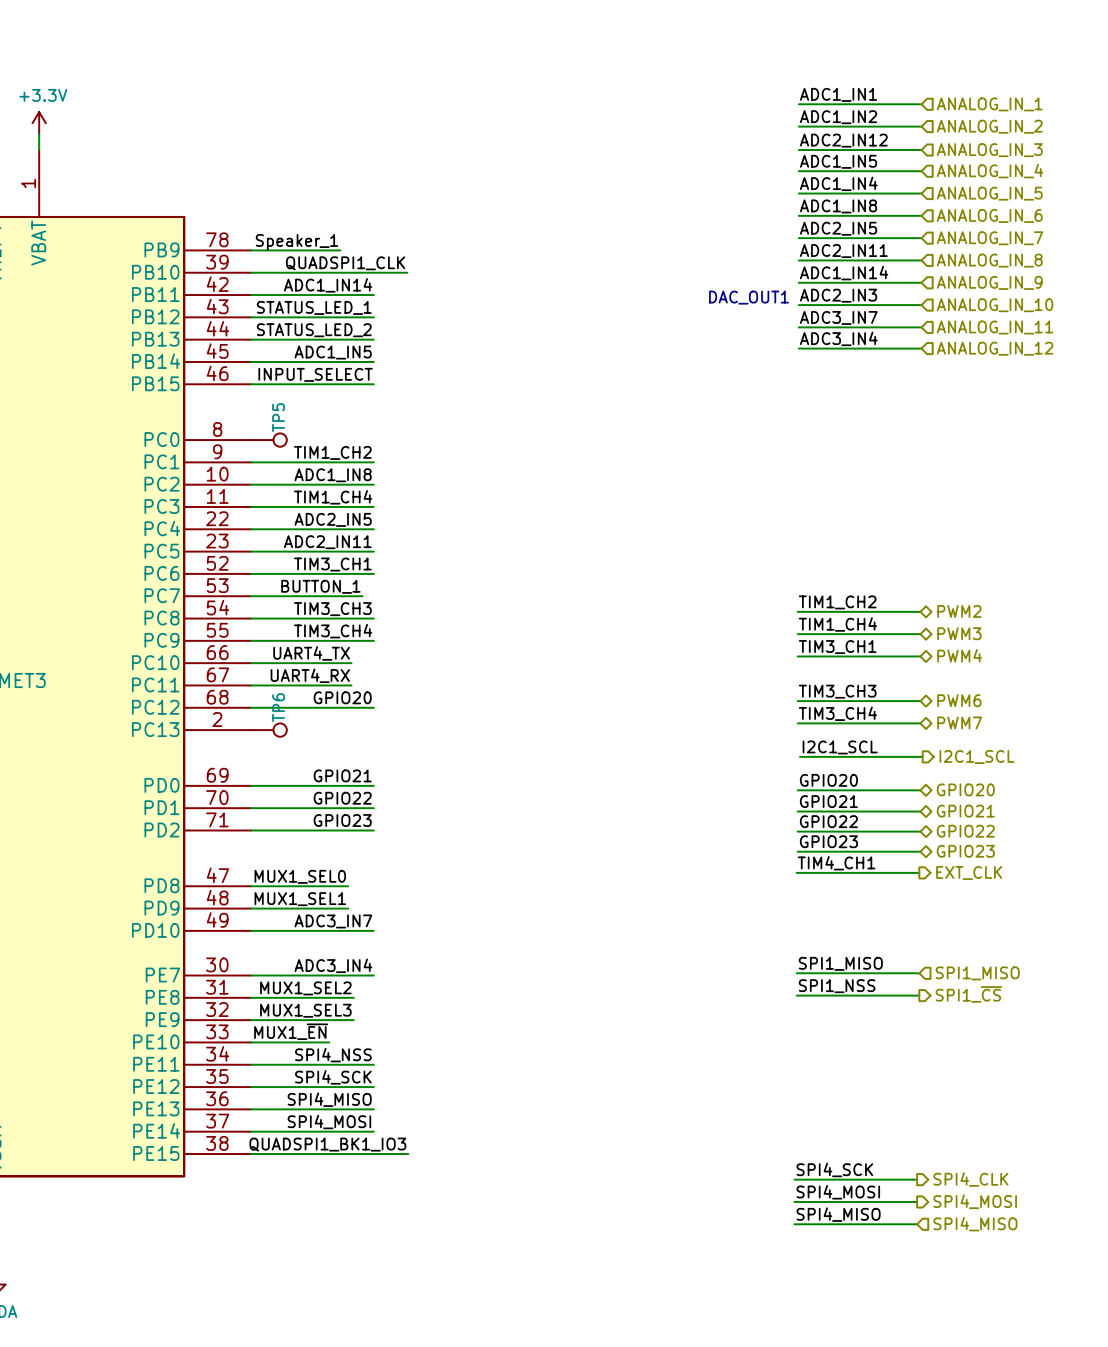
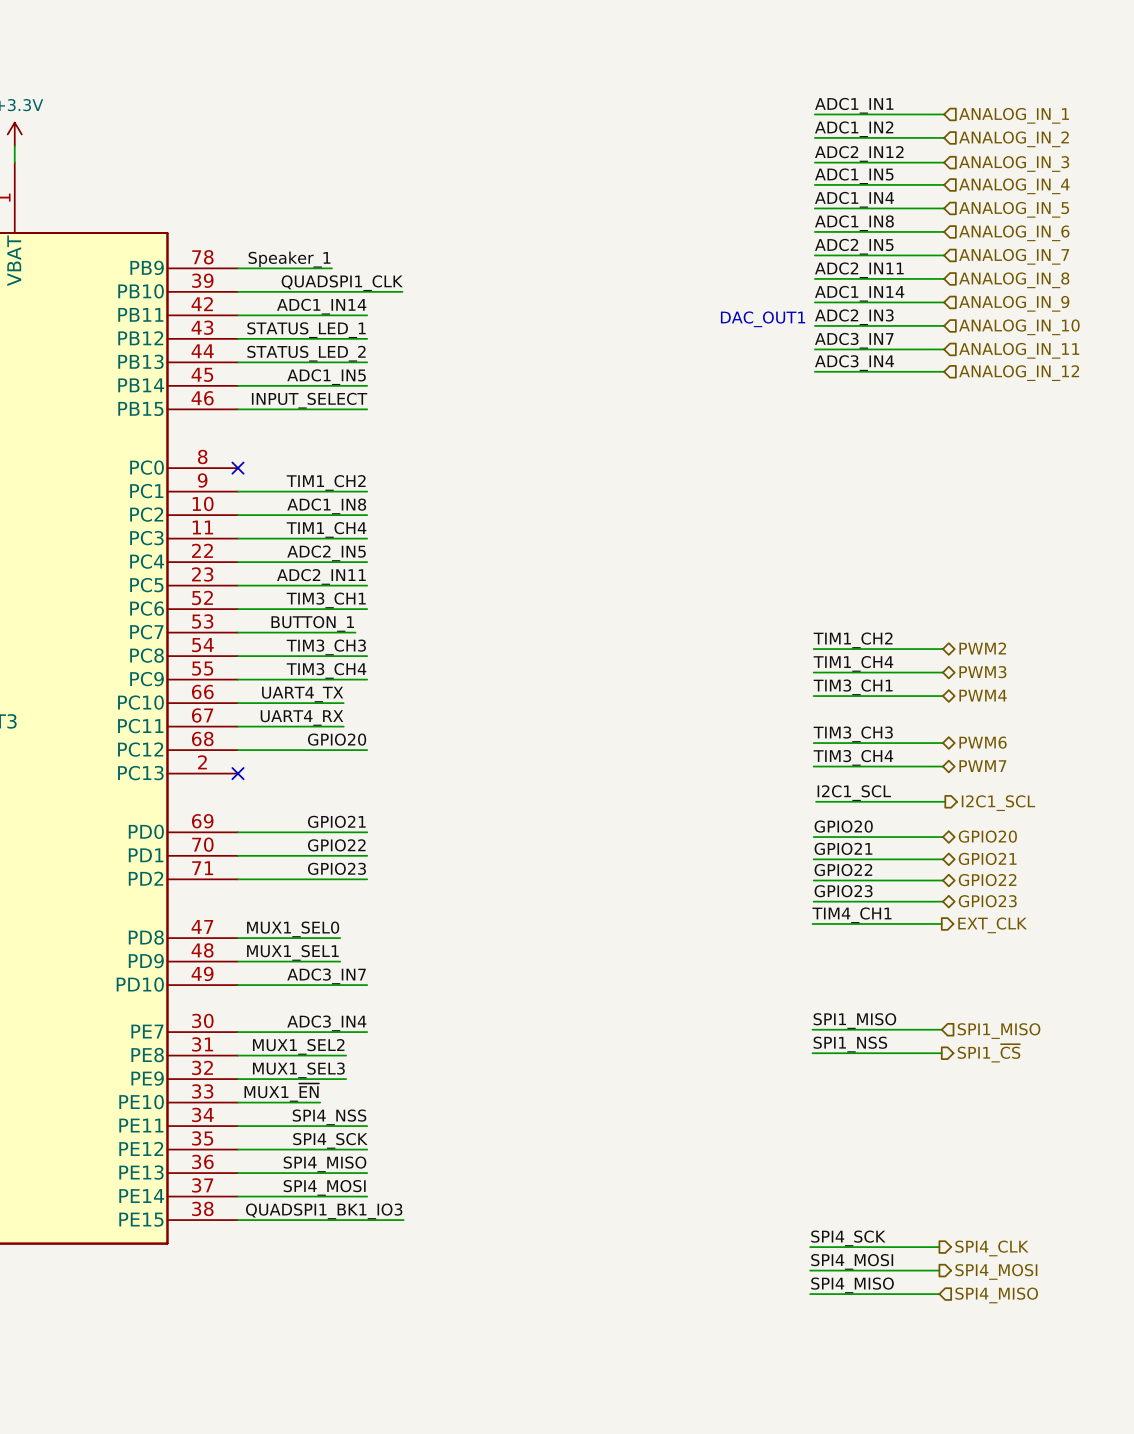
no-connect mark: none -> (237, 468)
TP5: (268, 440) -> none
no-connect mark: none -> (237, 773)
TP6: (268, 730) -> none

